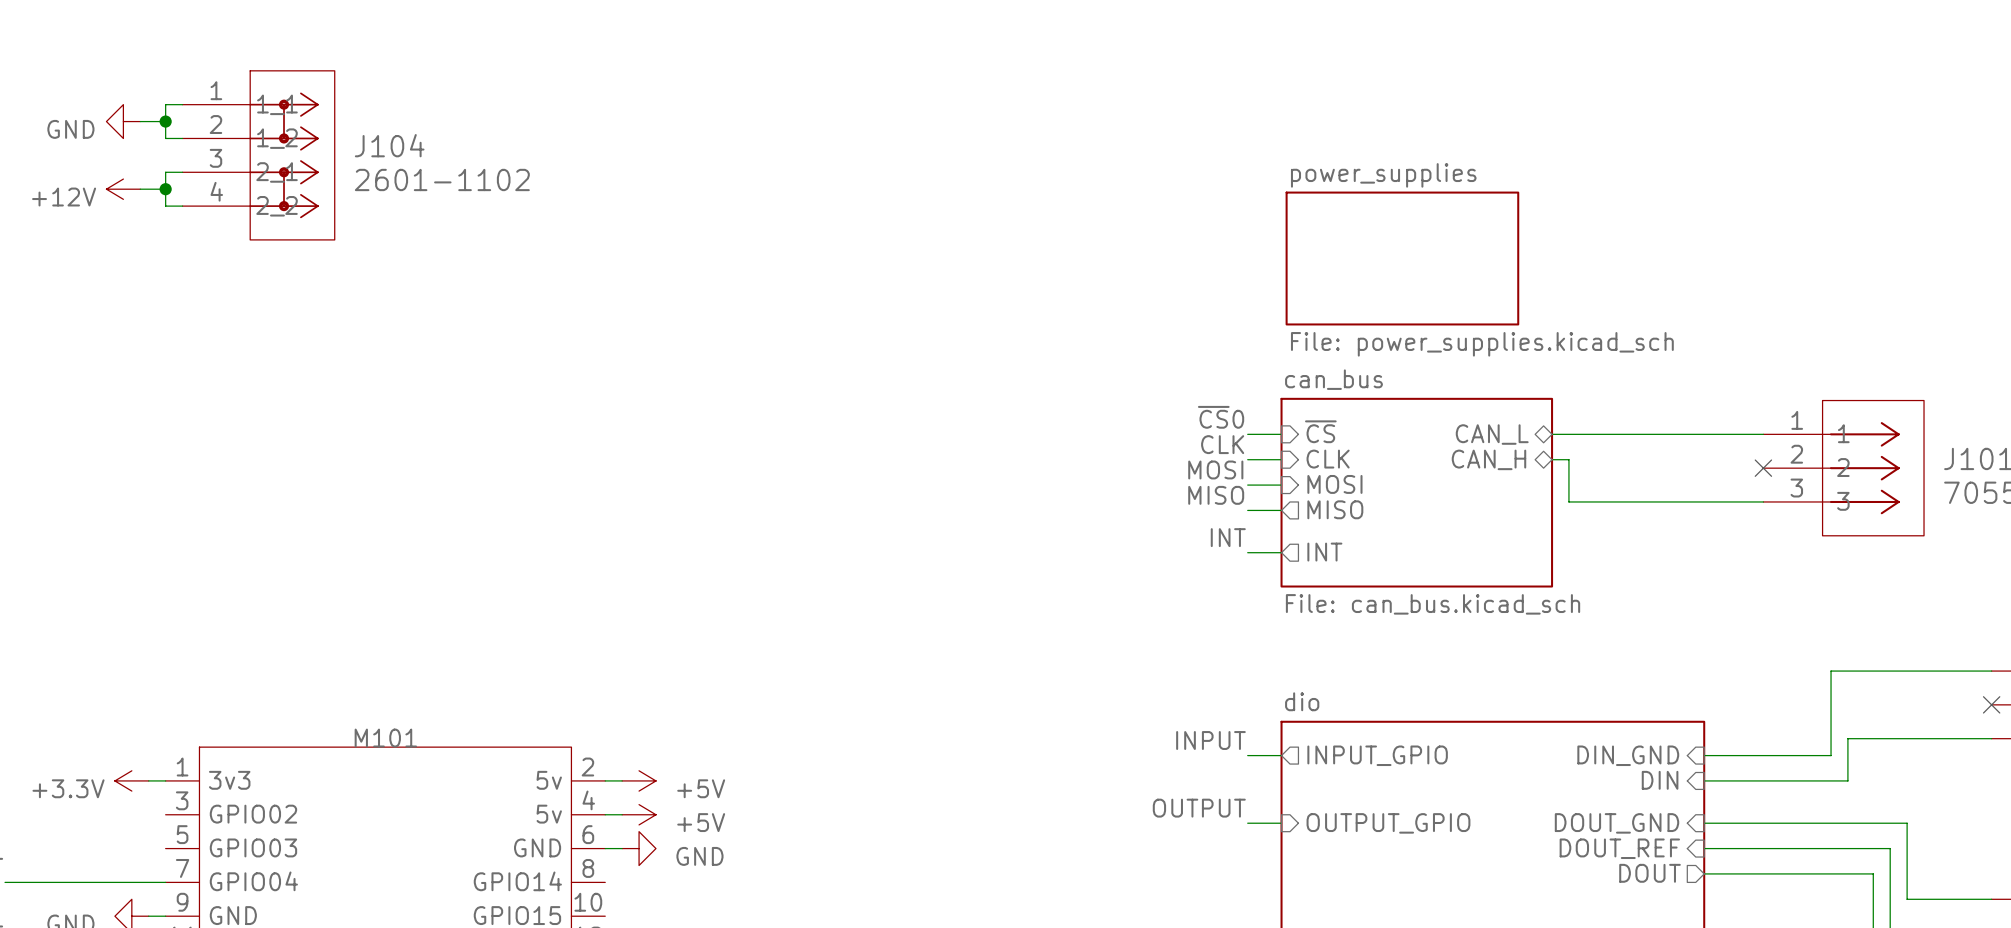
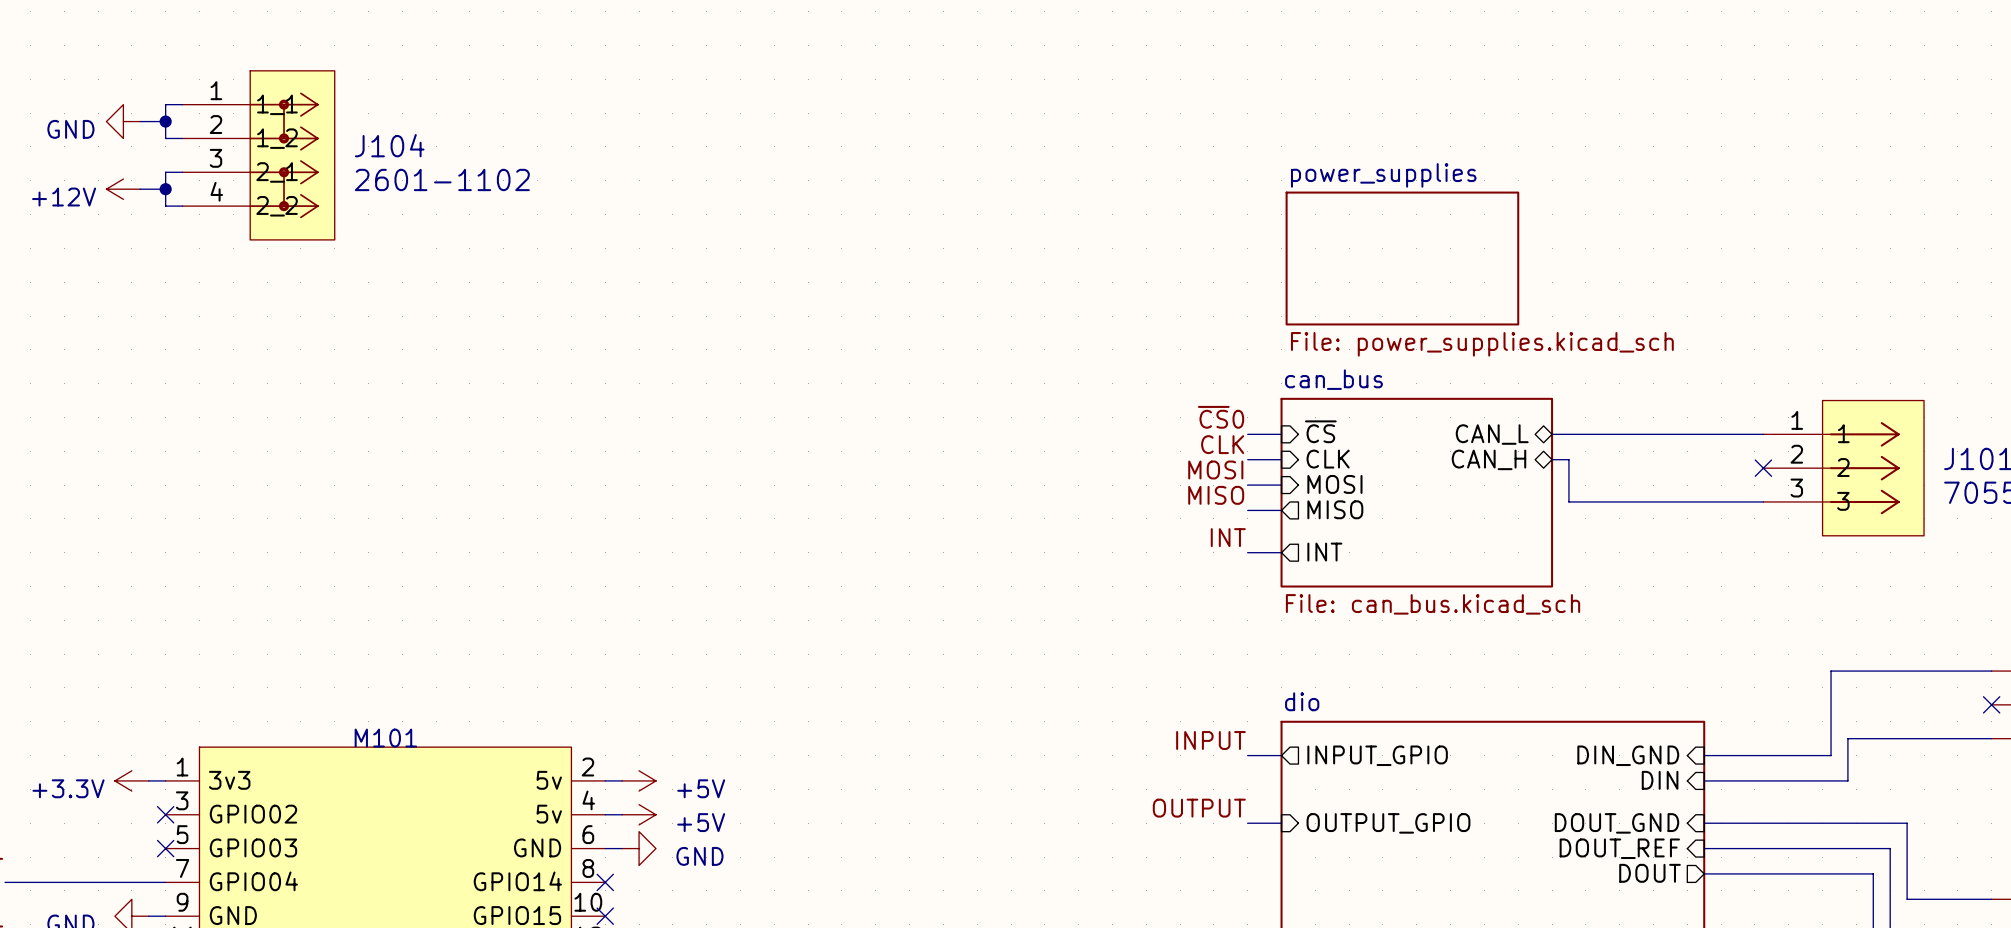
no-connect mark: none -> (165, 814)
no-connect mark: none -> (165, 848)
no-connect mark: none -> (605, 882)
no-connect mark: none -> (605, 916)

